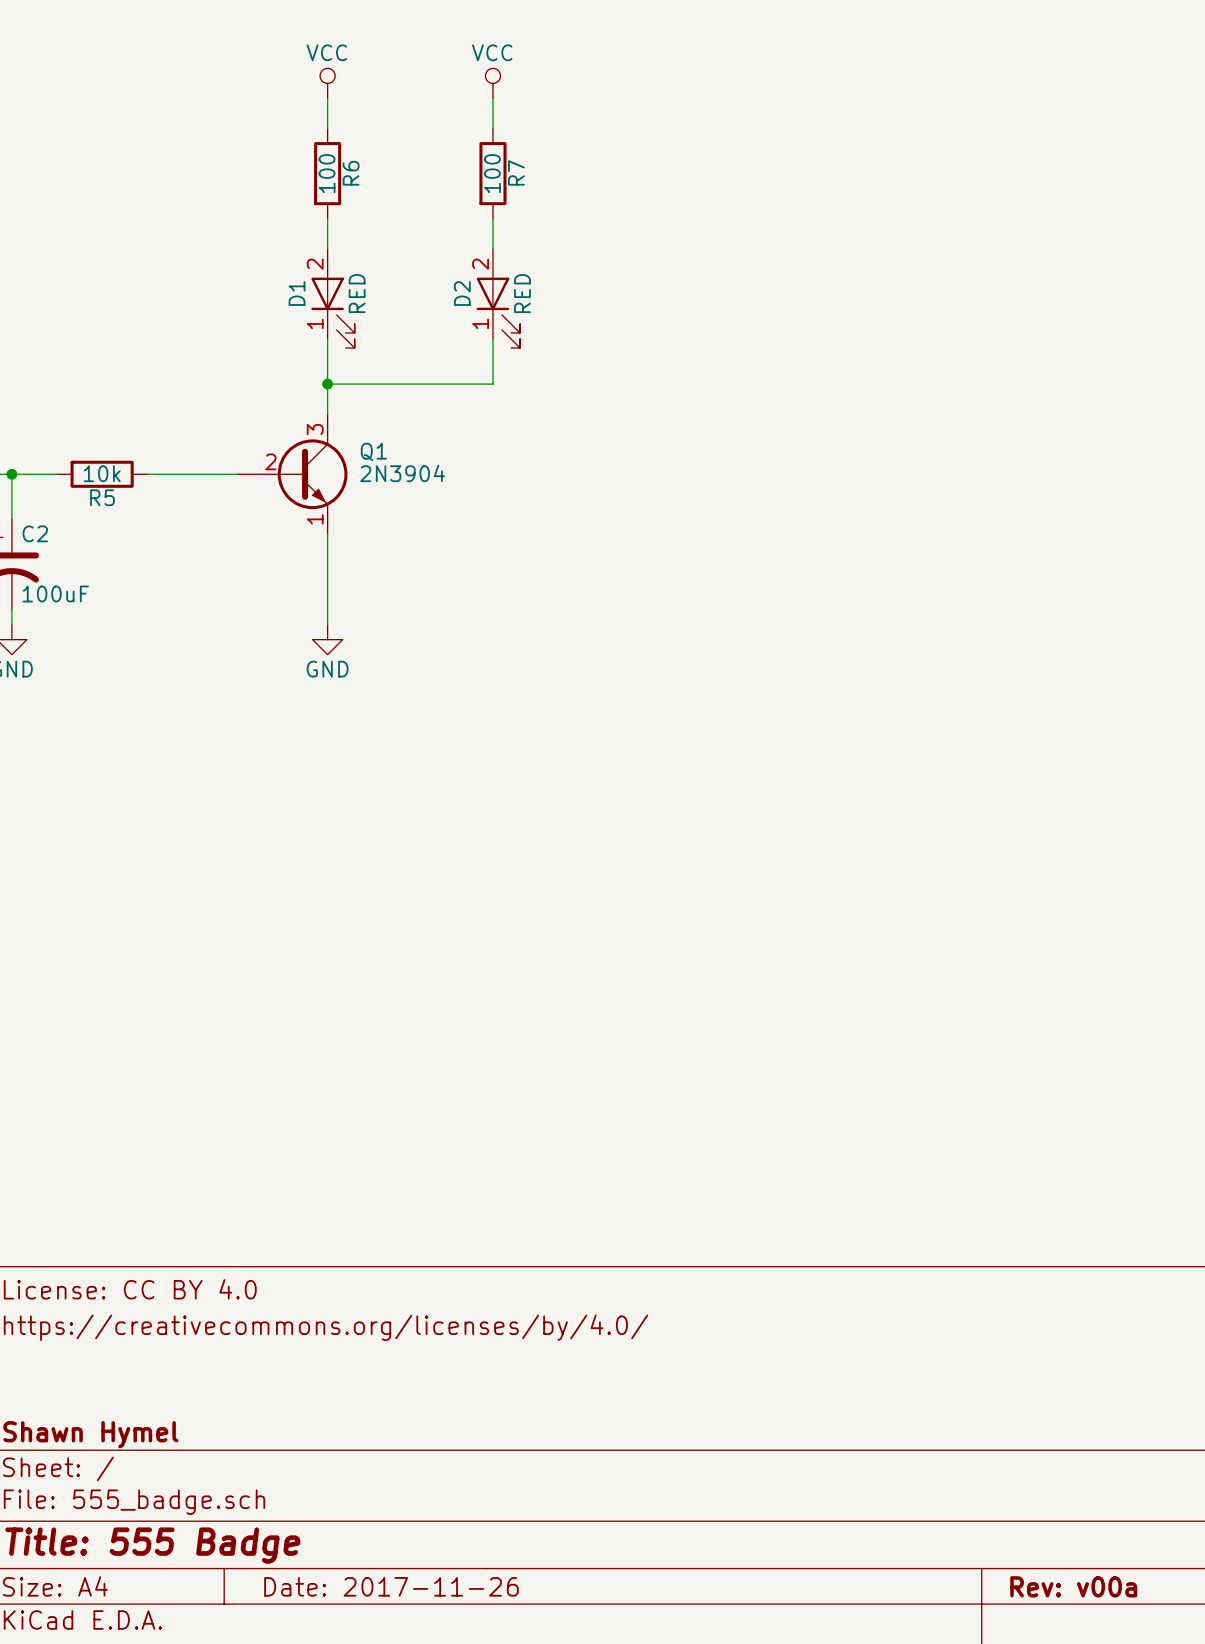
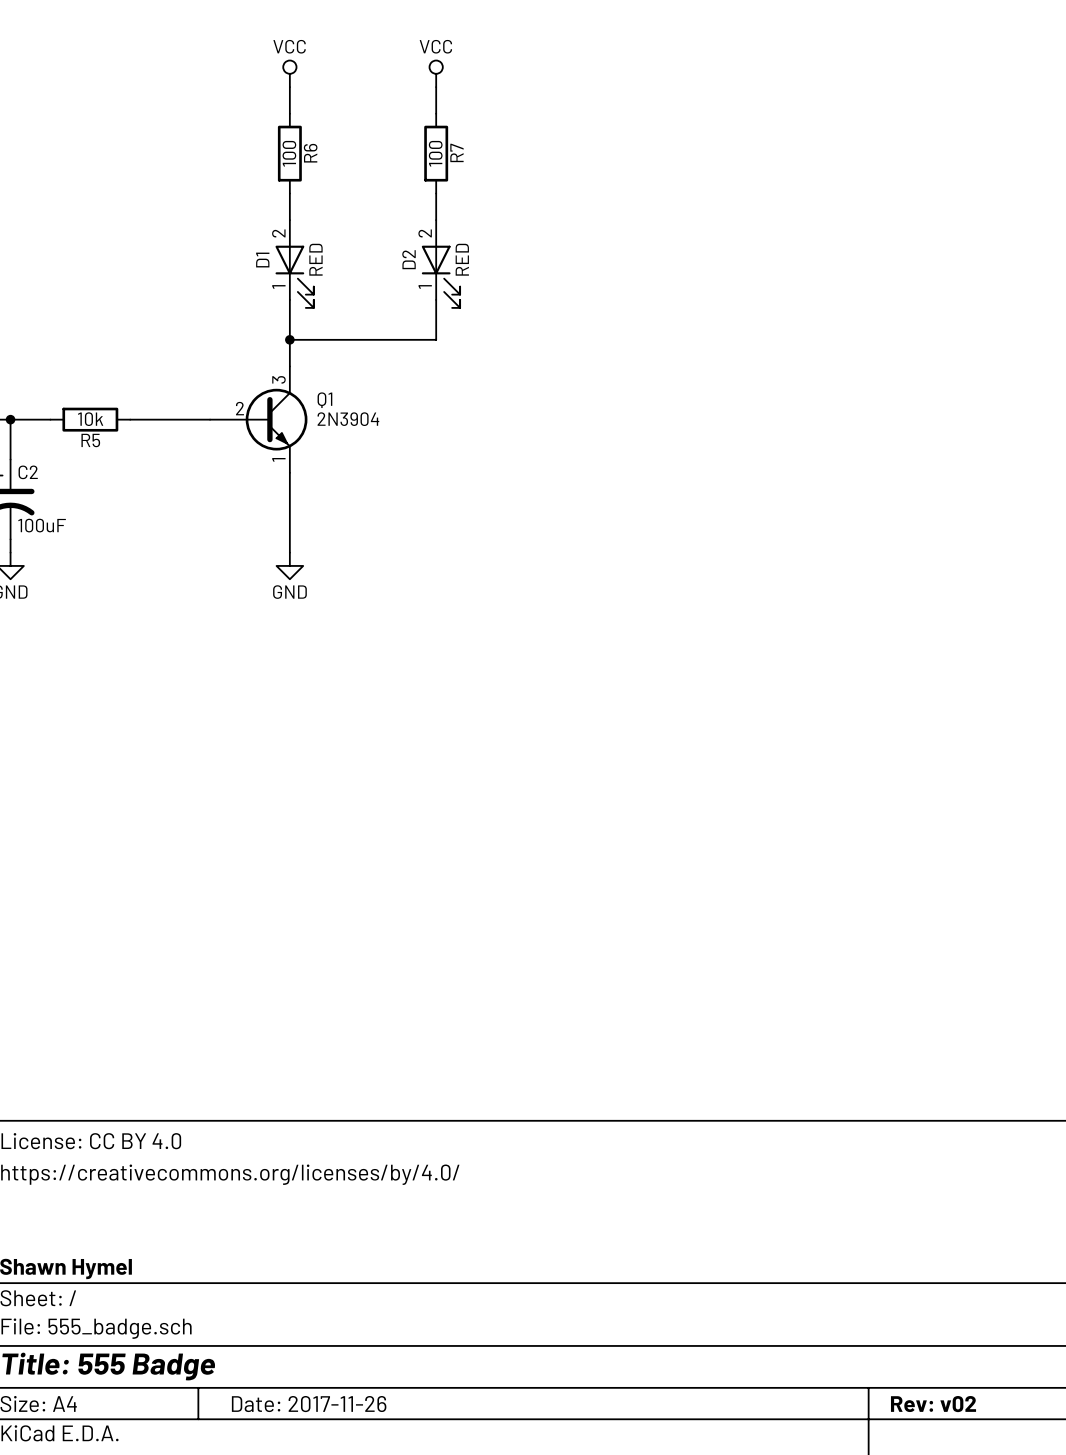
title block: Rev: v00a (1073, 1586) -> Rev: v02 (933, 1404)

